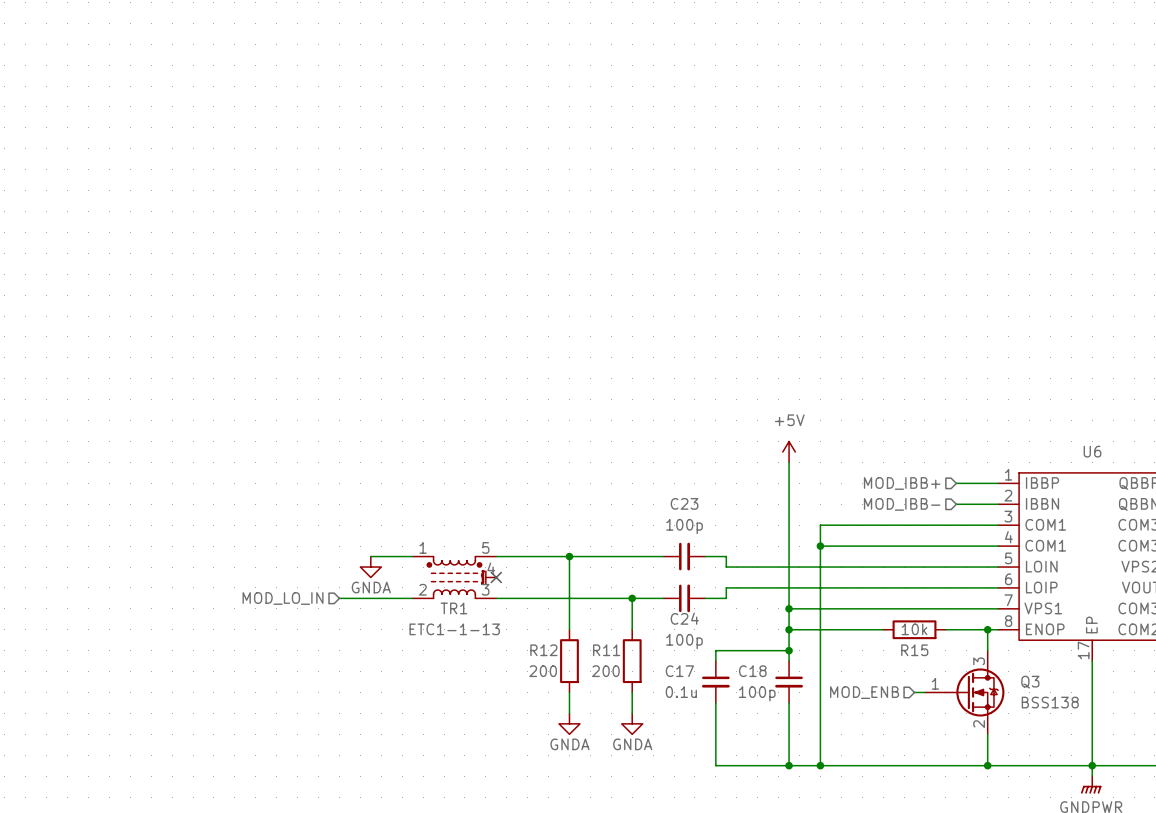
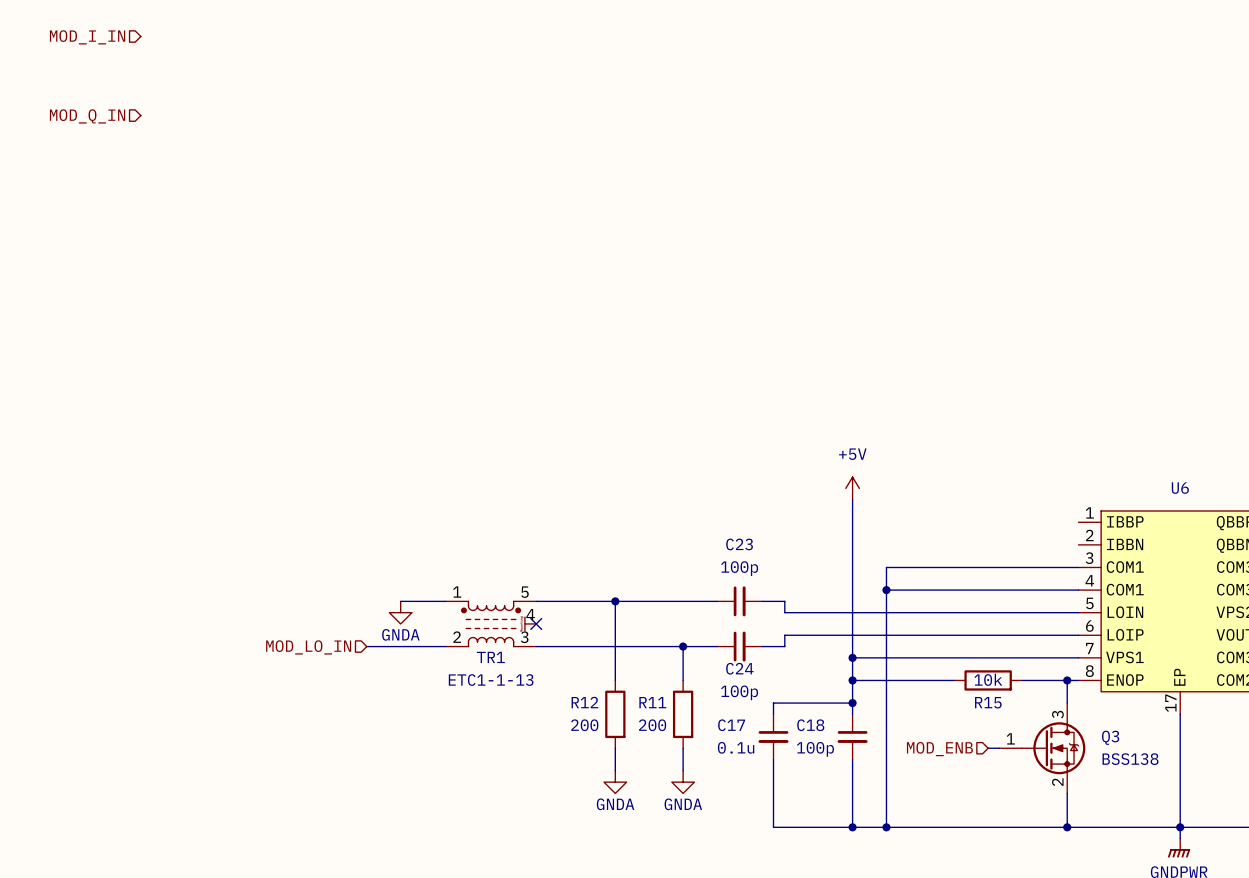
hierarchical label: none -> MOD_I_IN (87, 37)
hierarchical label: none -> MOD_Q_IN (87, 116)
hierarchical label: MOD_IBB+ (902, 483) -> none
wire: (956, 483) (998, 483) -> none
hierarchical label: MOD_IBB- (902, 504) -> none
wire: (956, 504) (998, 504) -> none

